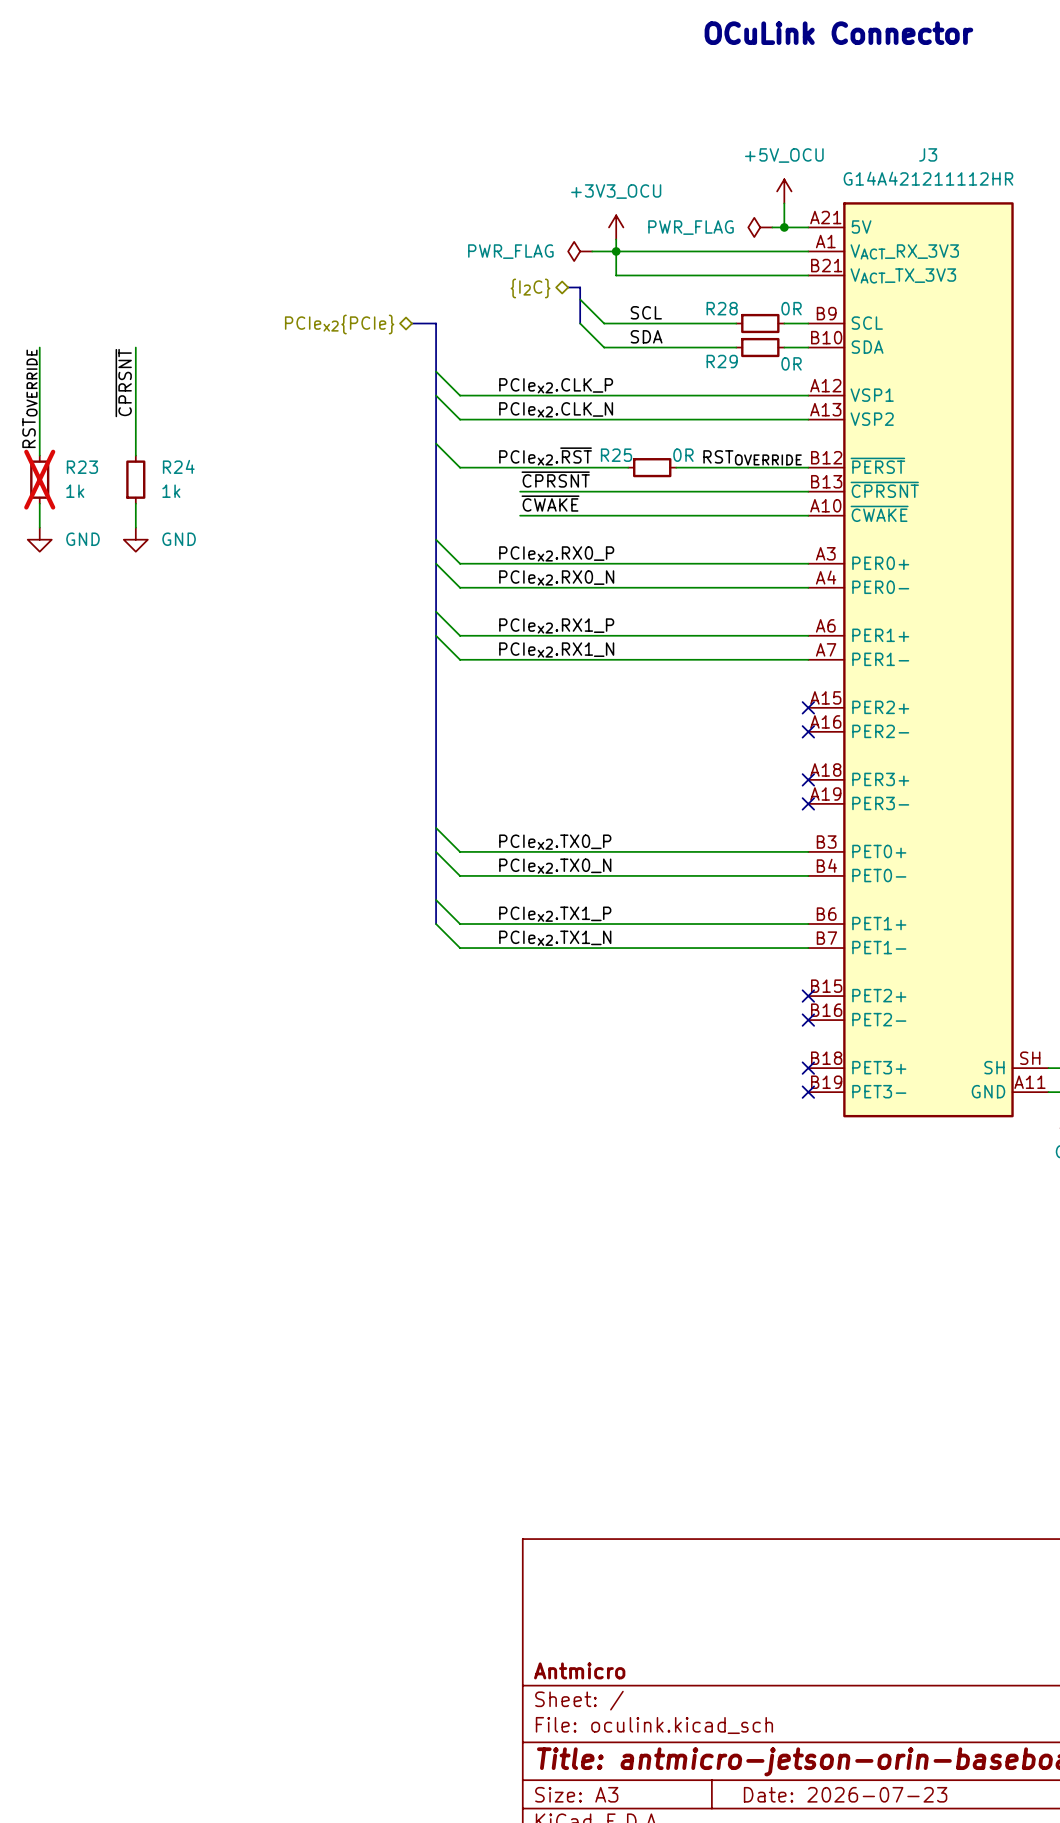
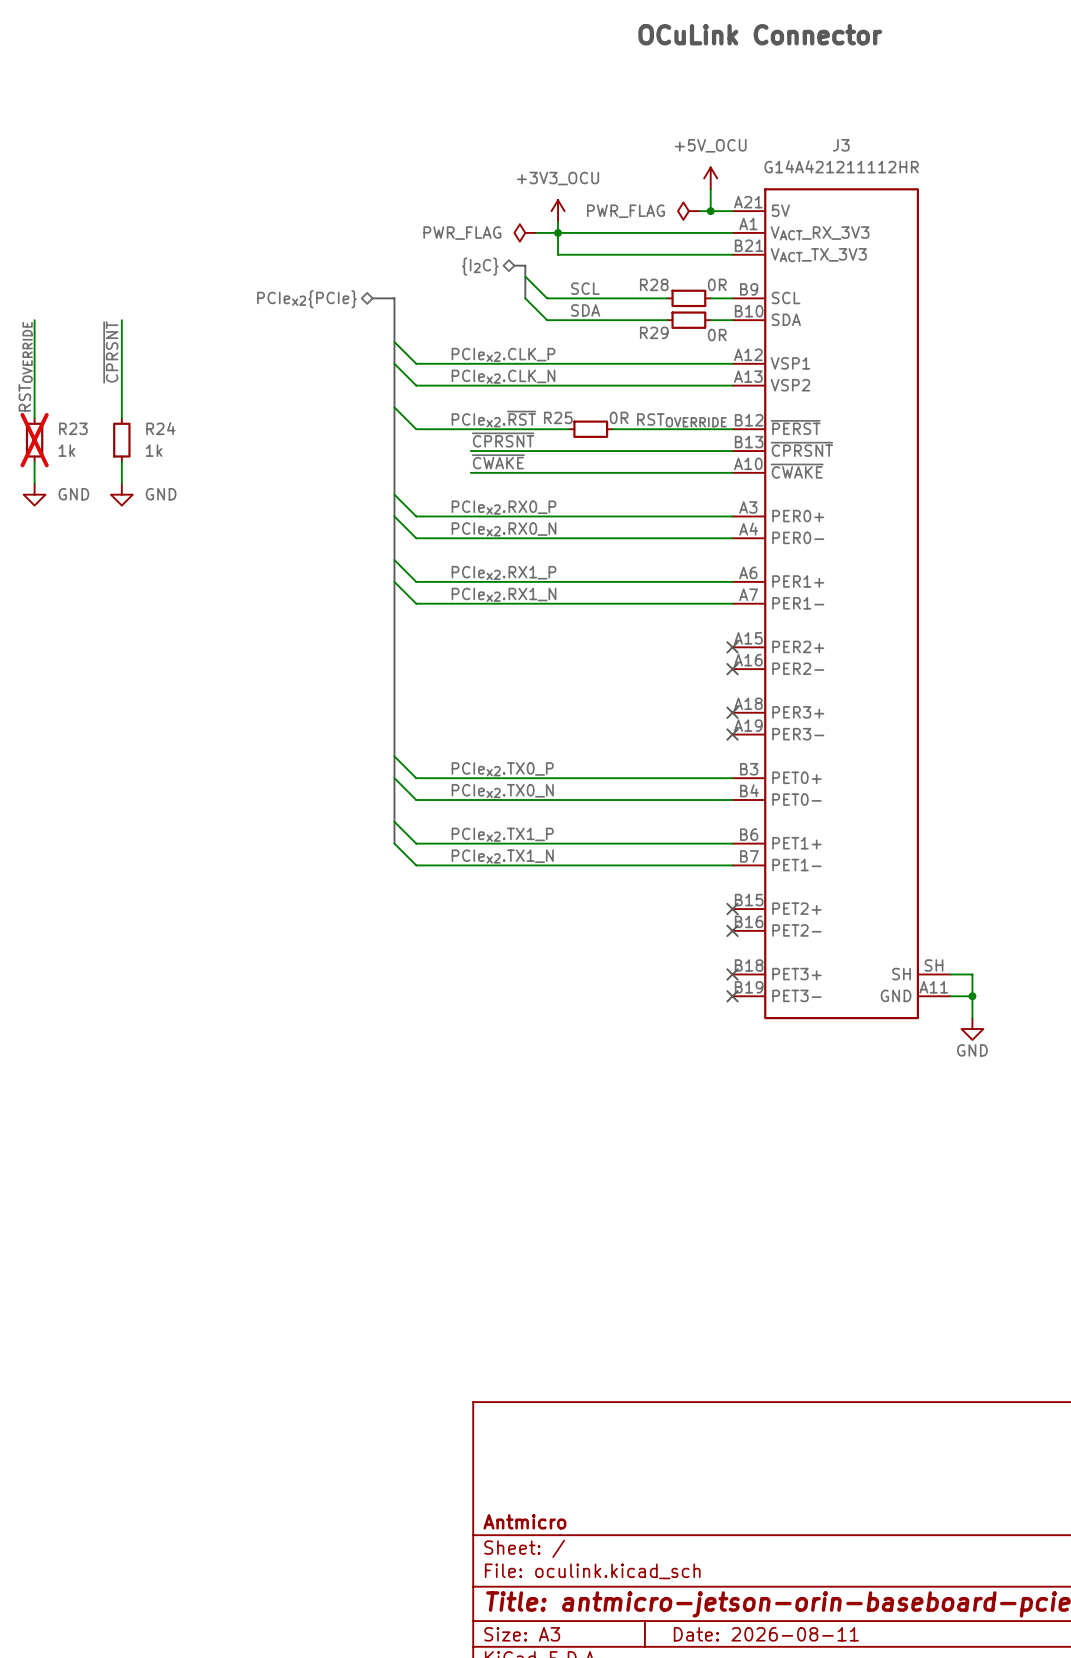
title block: Date: 2026-07-23 (845, 1794) -> Date: 2026-08-11 (766, 1634)

